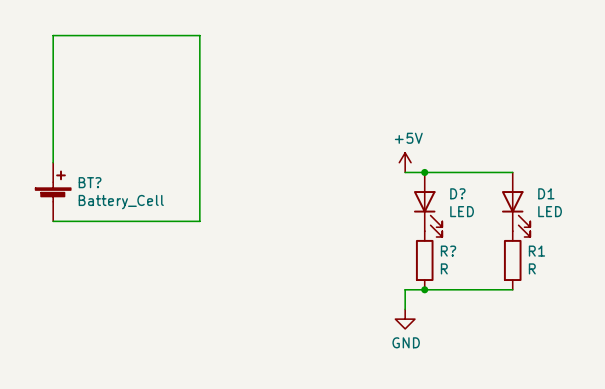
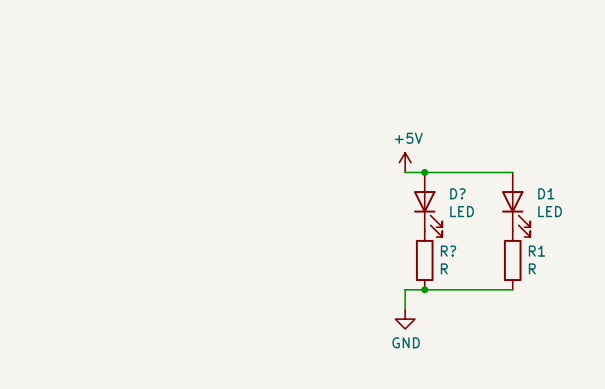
wire: (53, 162) (53, 35) (199, 35) (199, 221) (53, 221) -> none
BT?: Battery_Cell (53, 192) -> none

